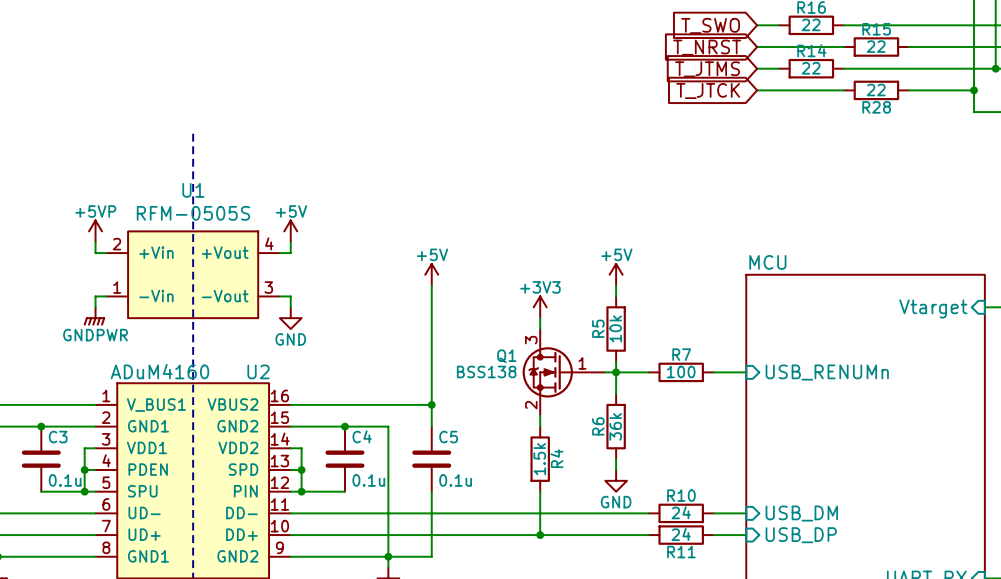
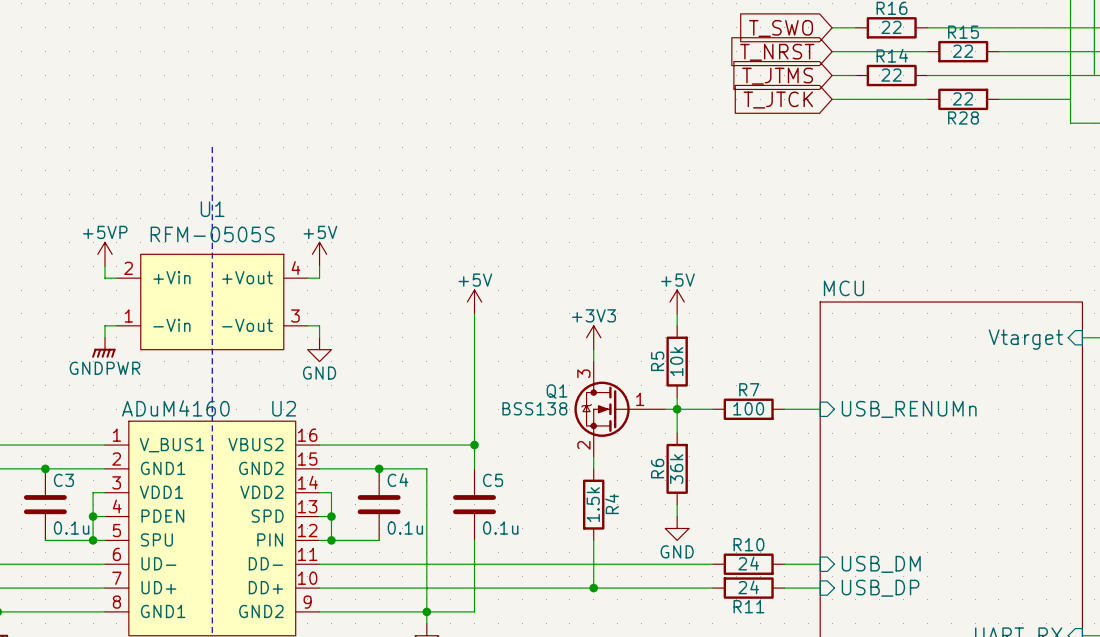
junction: (995, 68) -> none
junction: (974, 90) -> none

